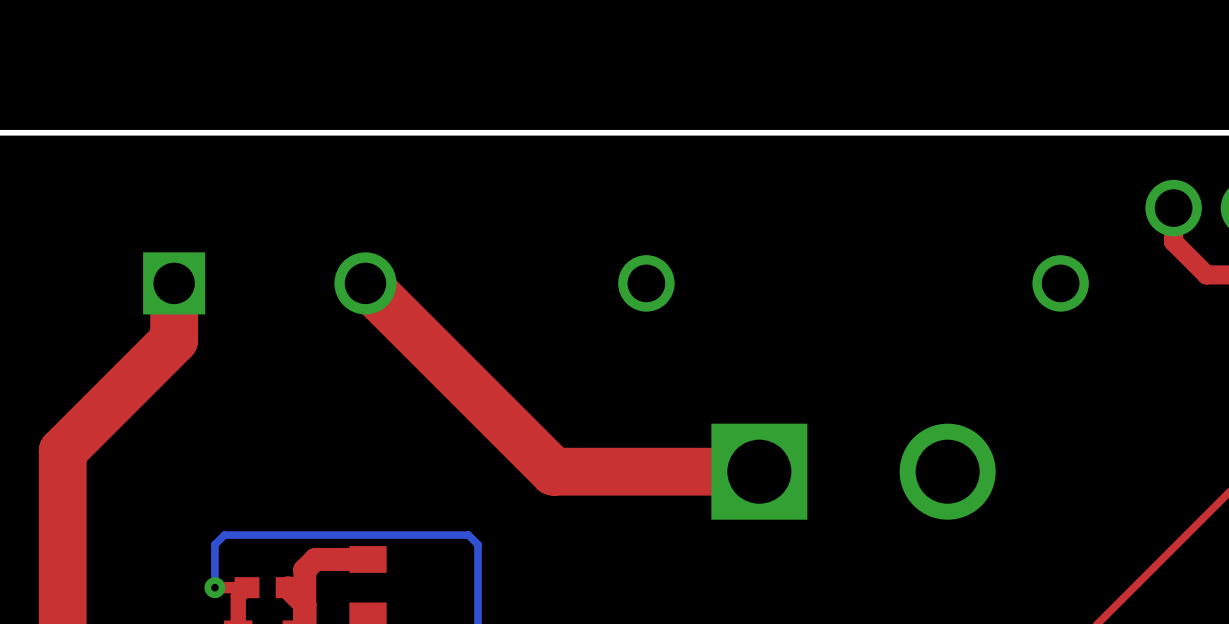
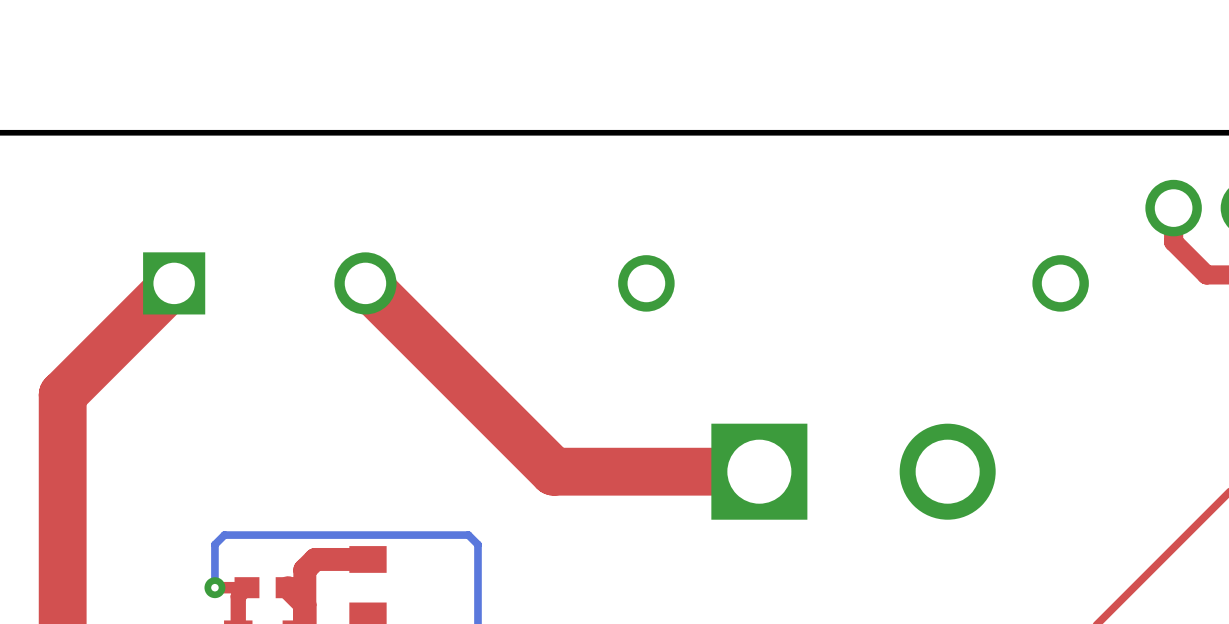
top track: (174, 283) (174, 339) (62, 451) -> (174, 283) (62, 394) (62, 451)

